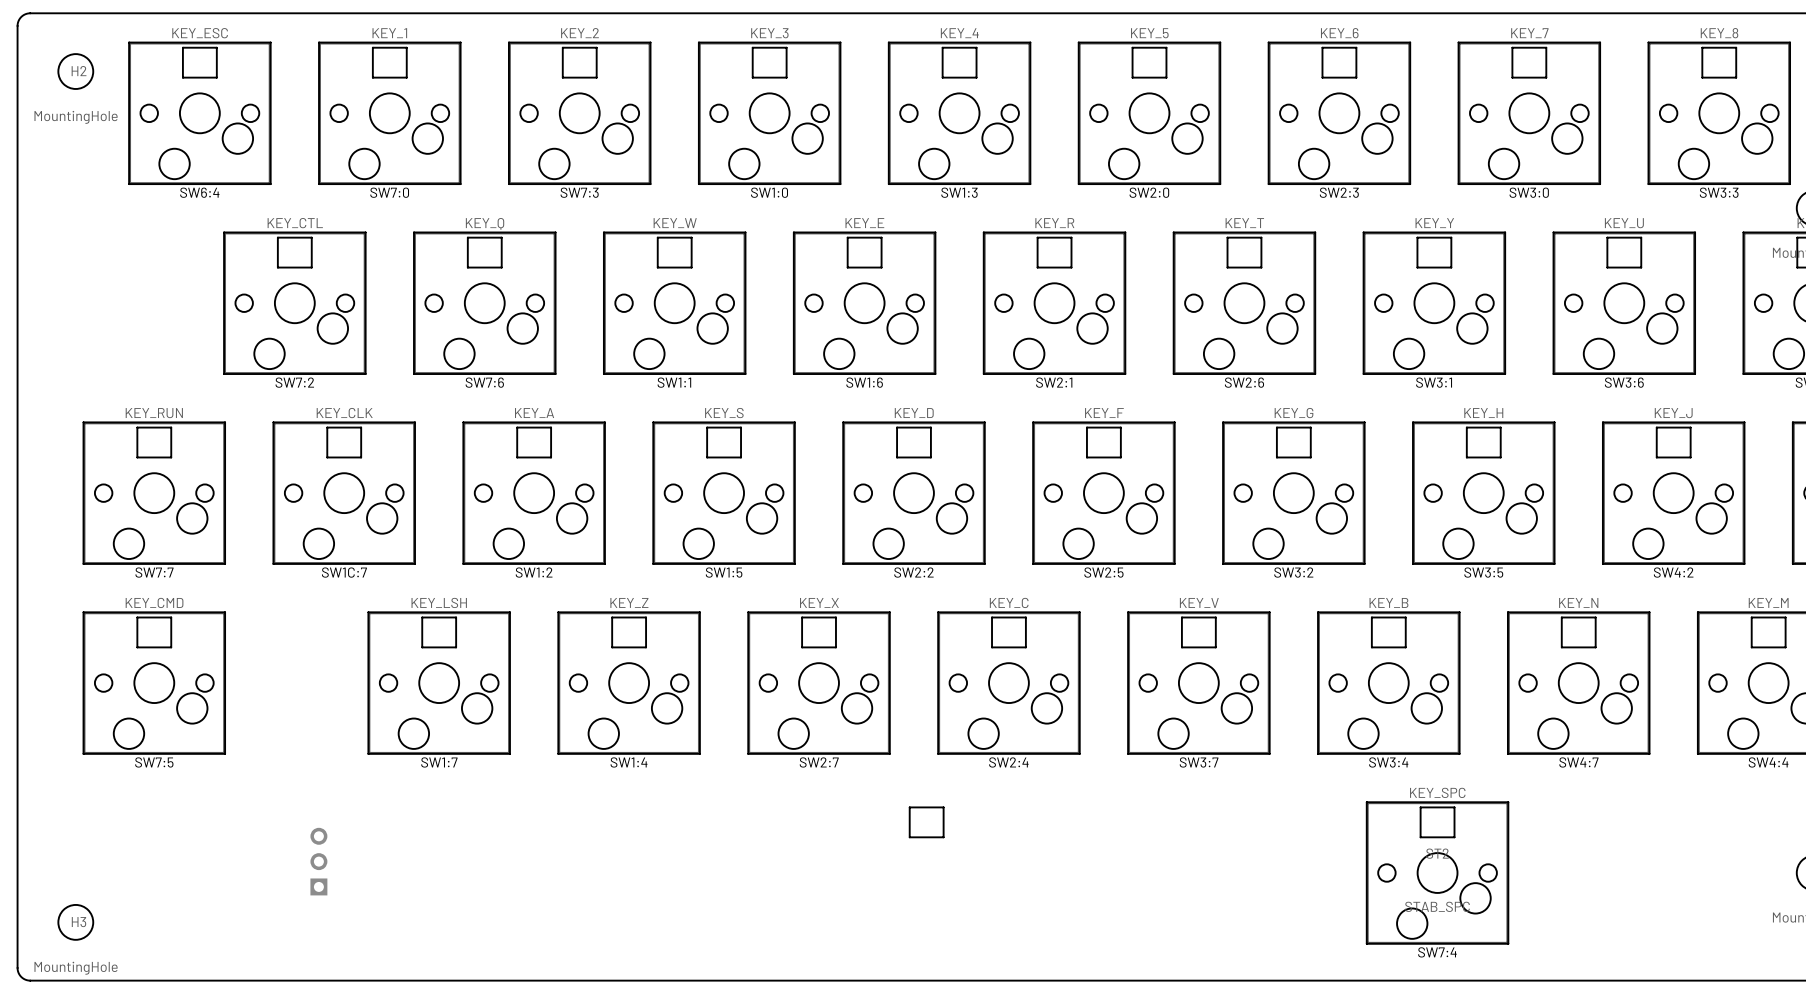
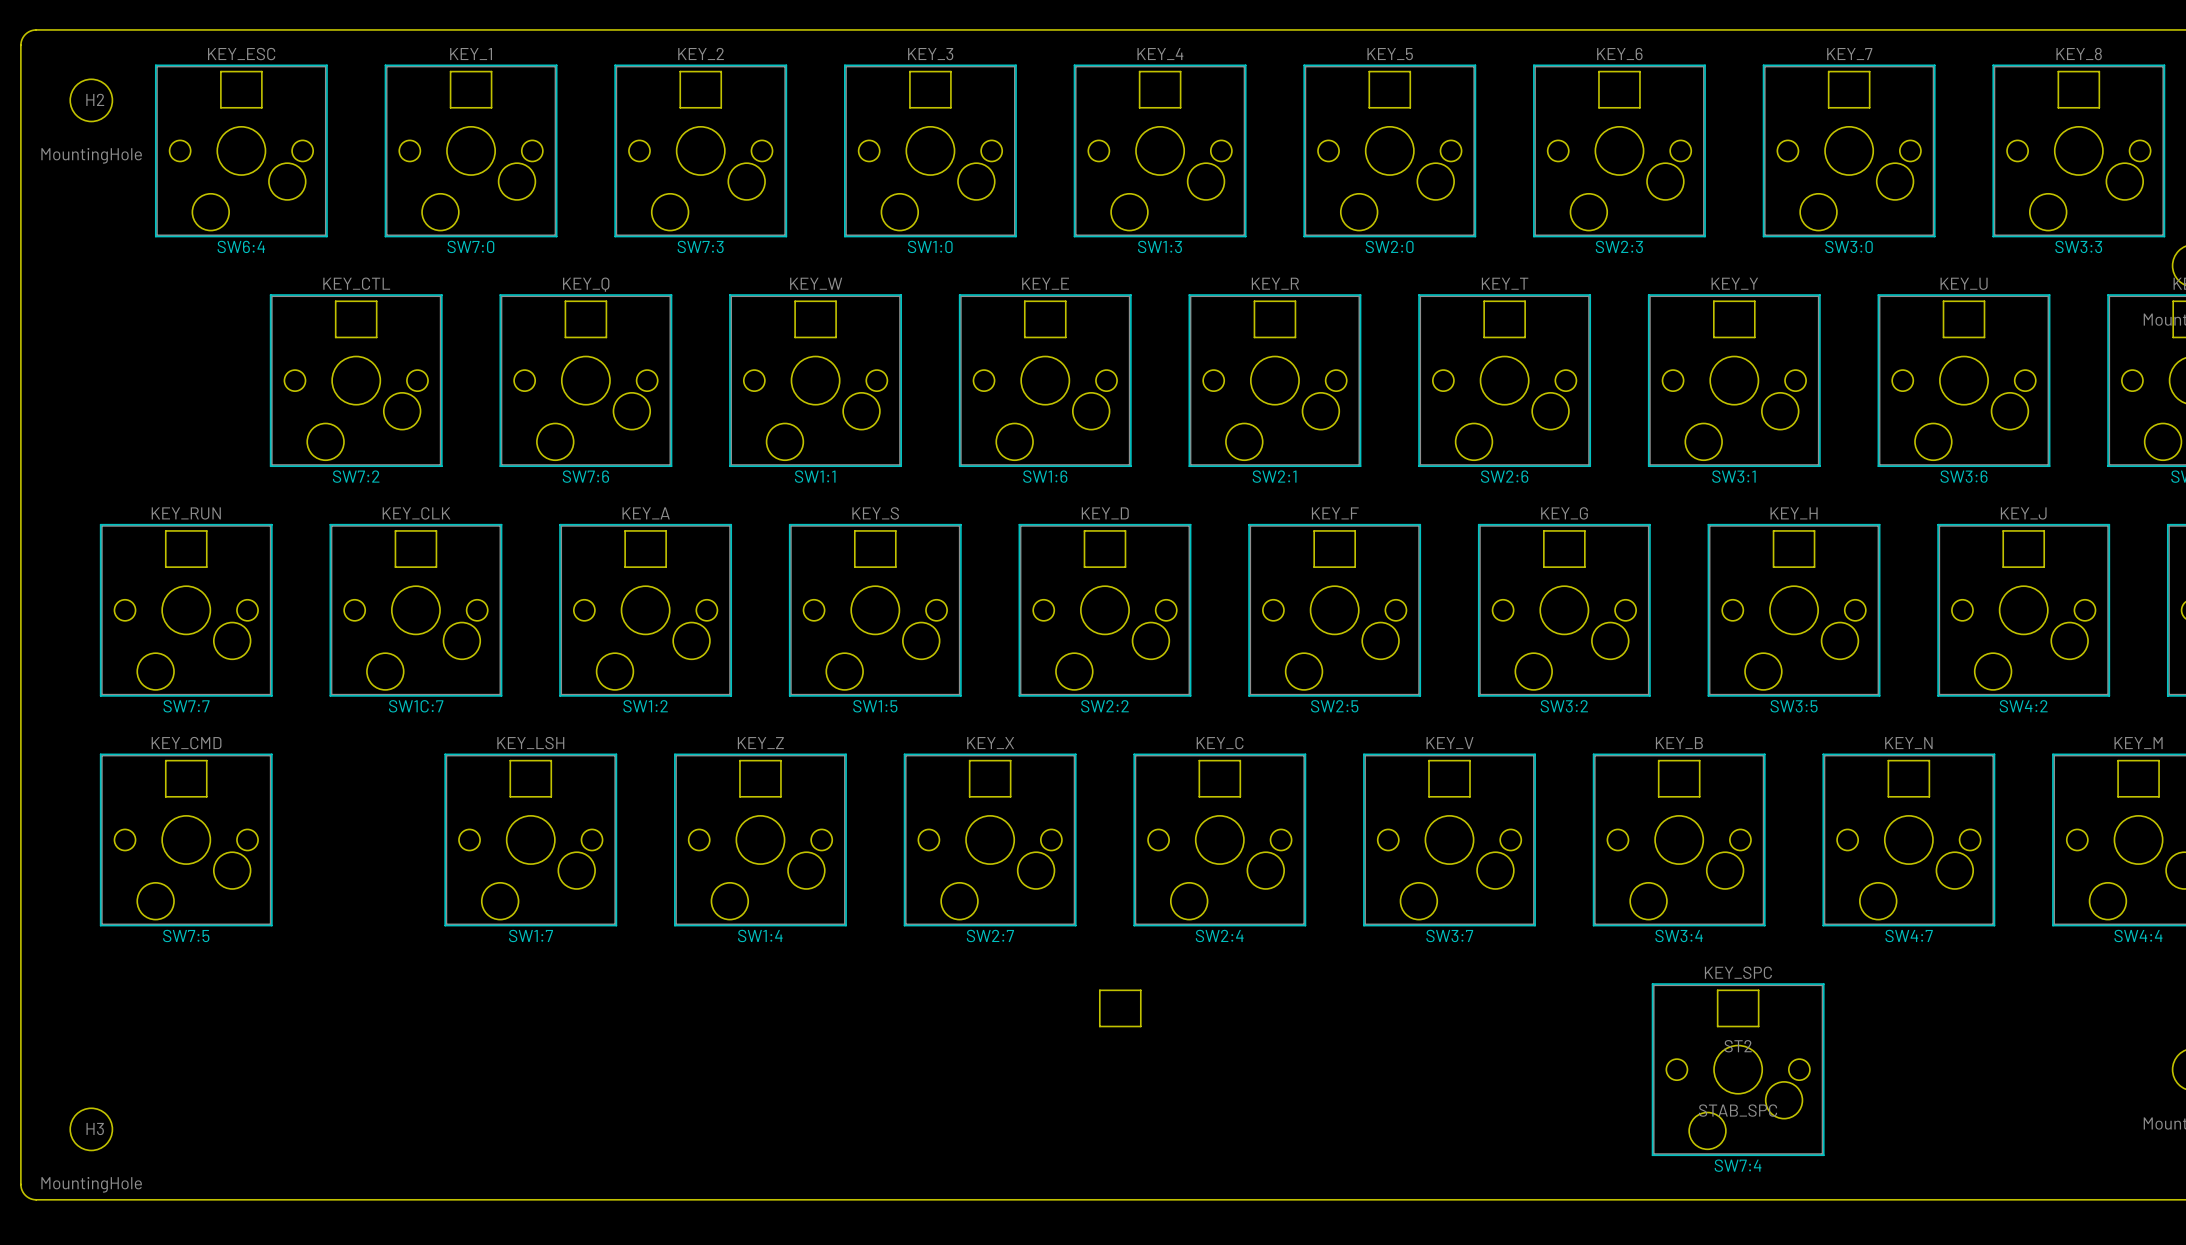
part: (318, 861) -> none

